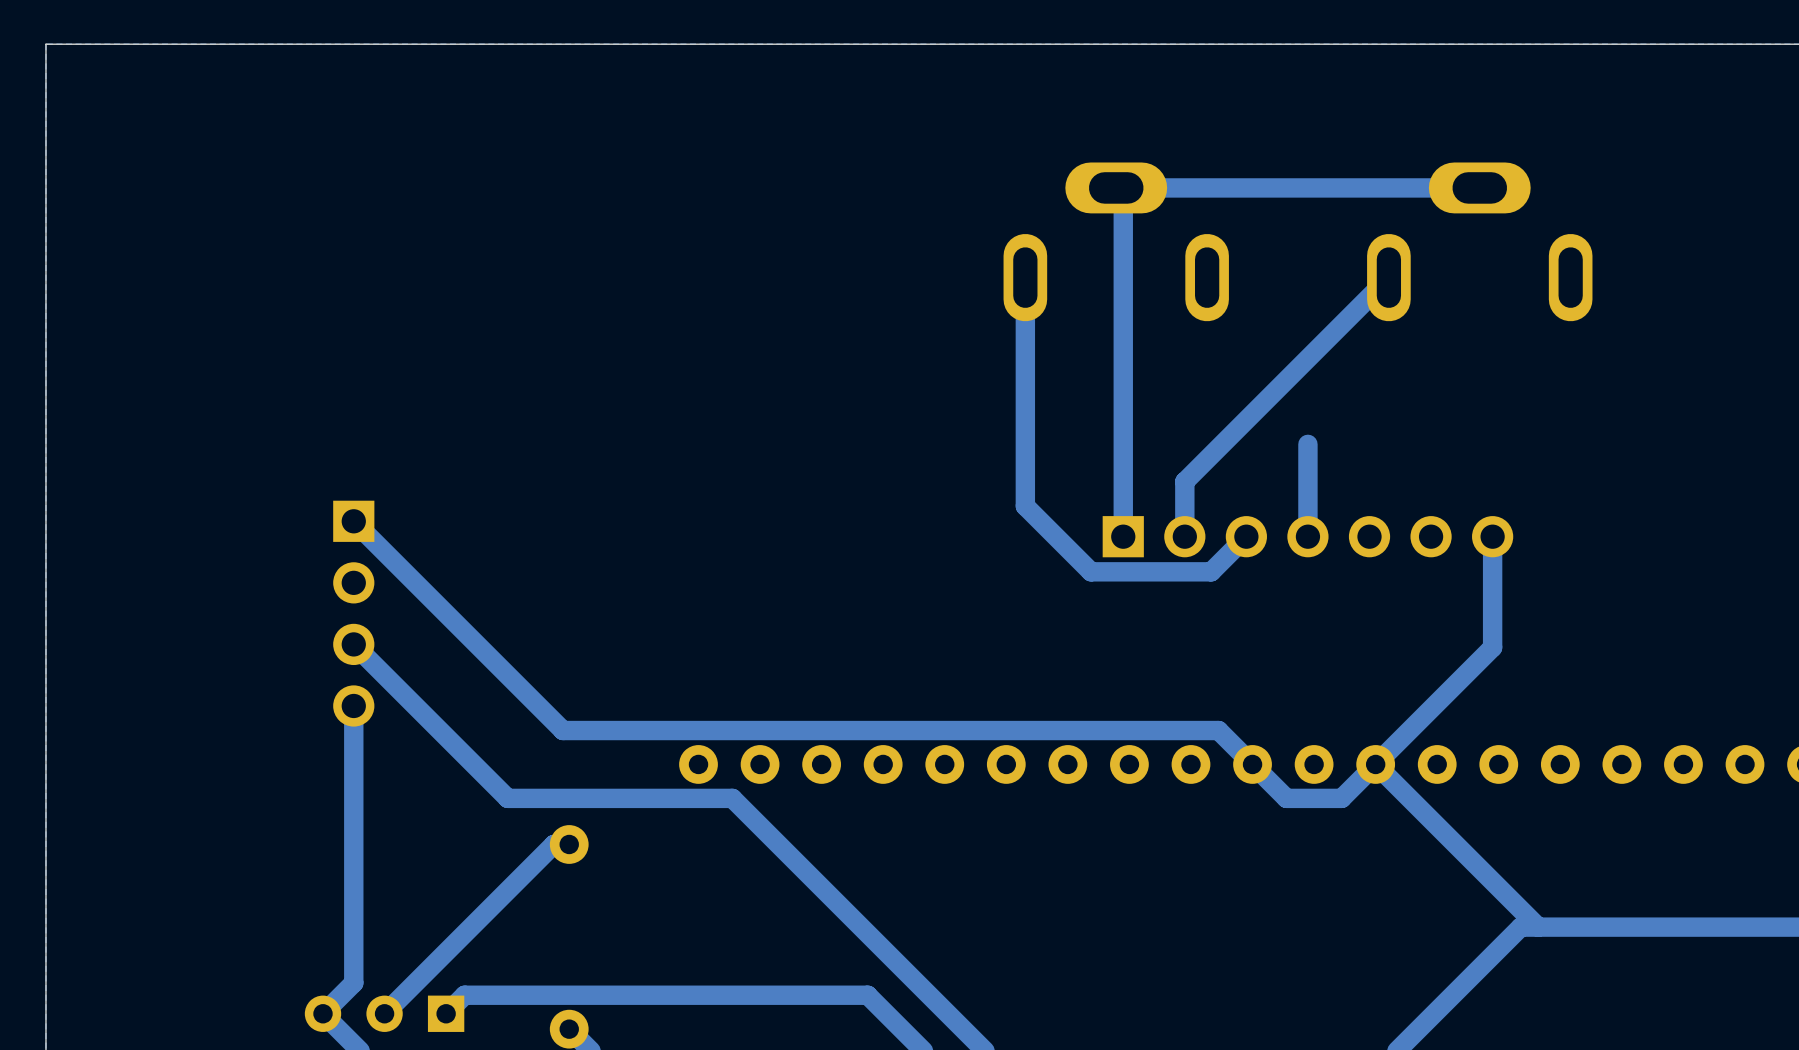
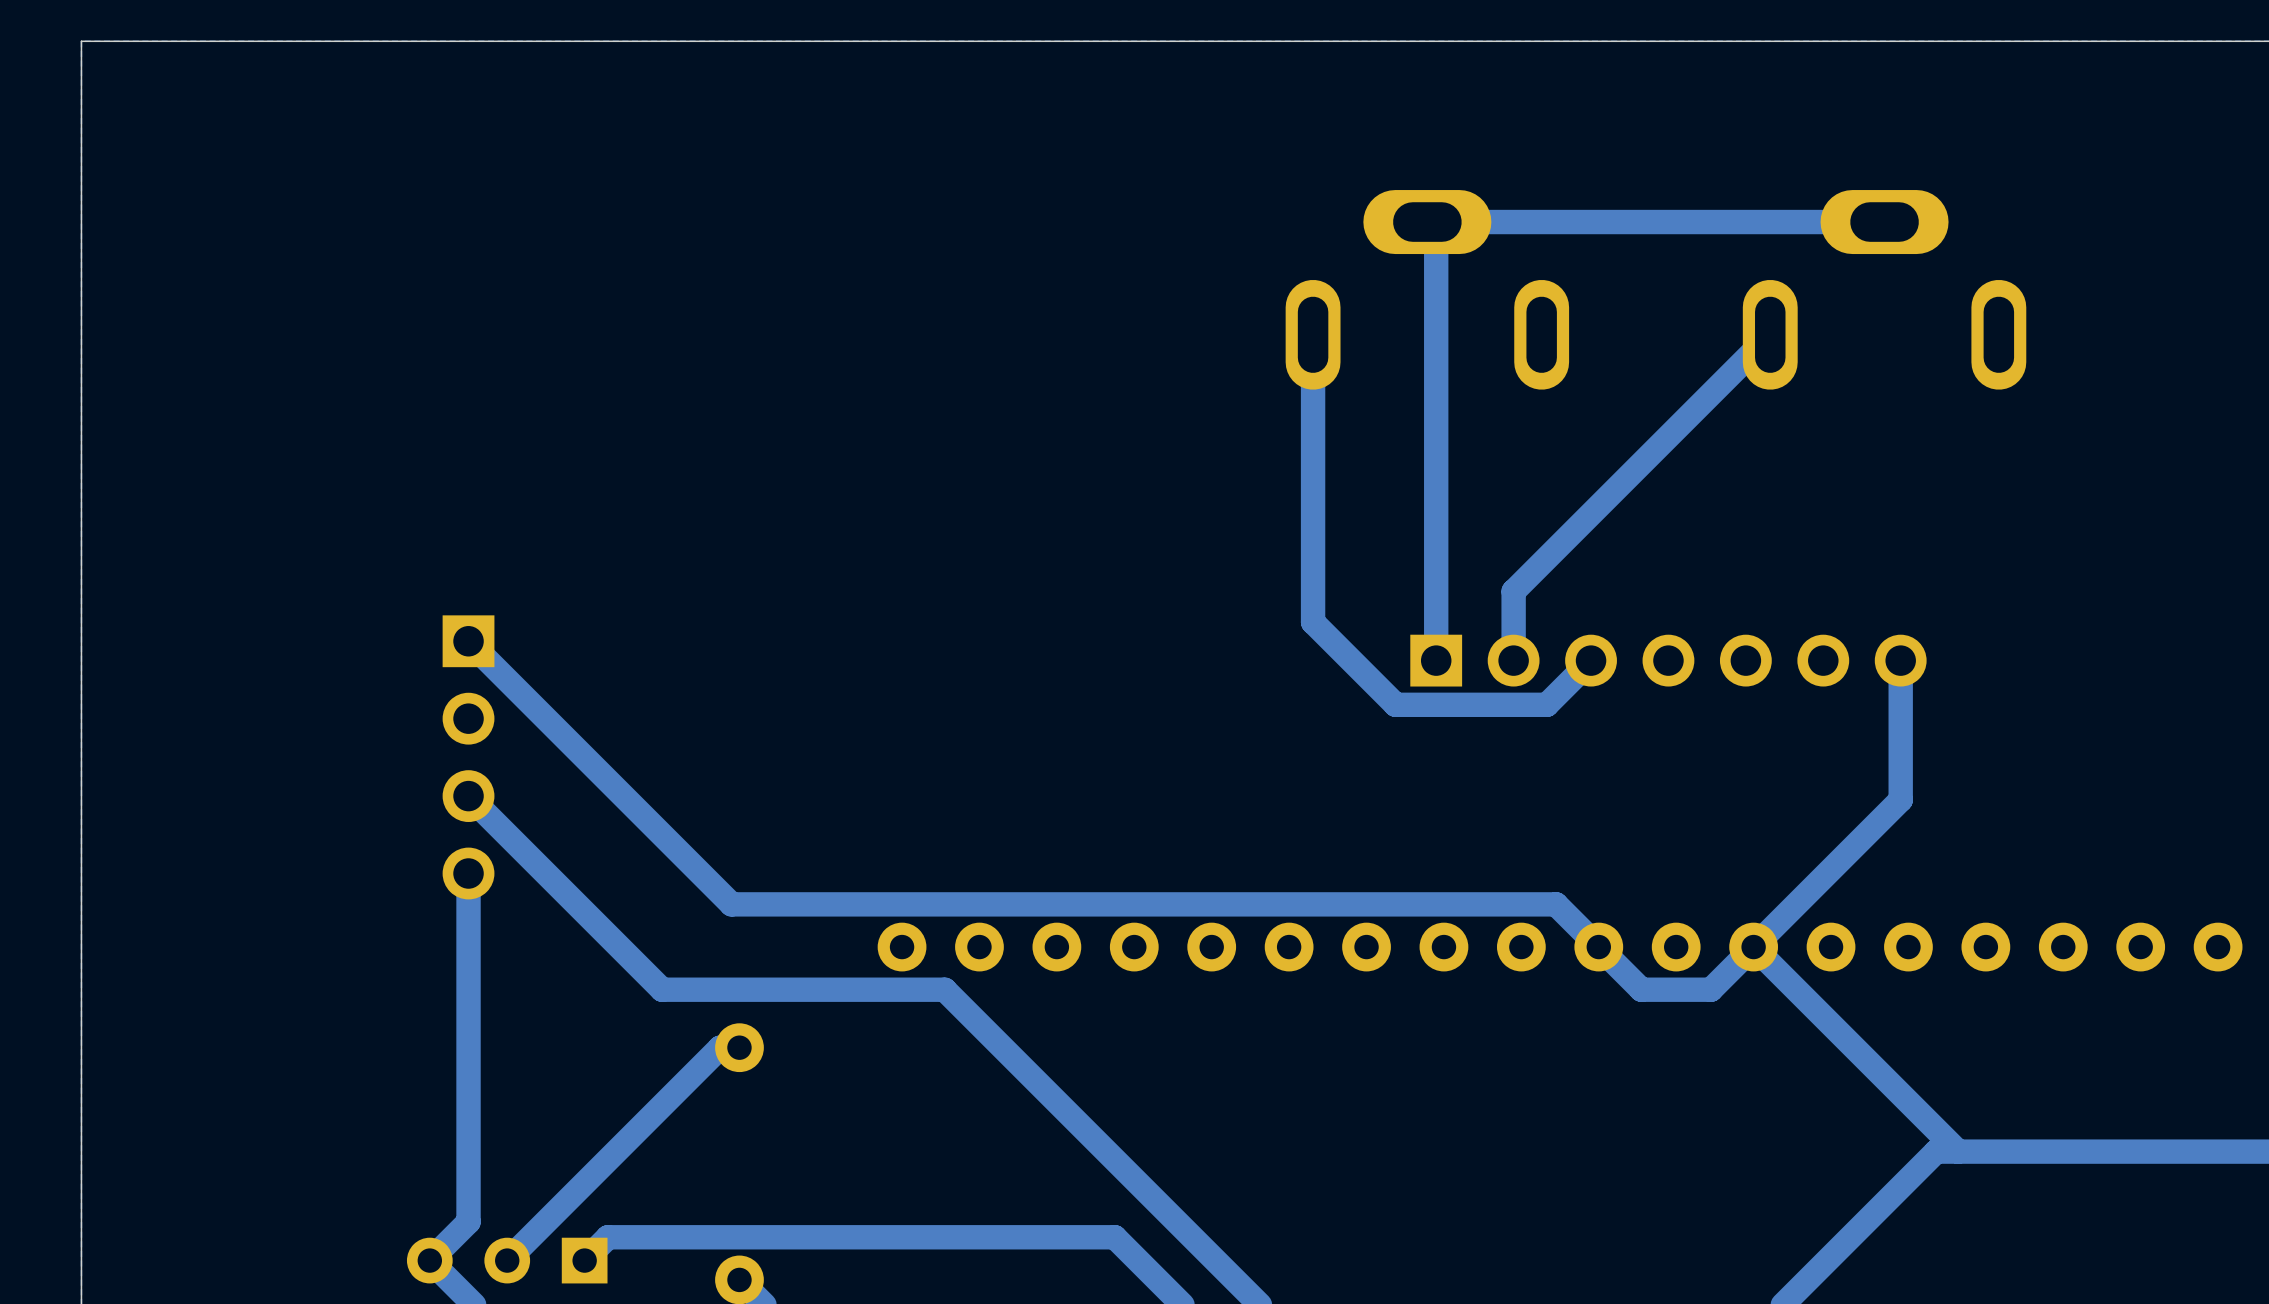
track: (1307, 444) (1307, 536) -> none

